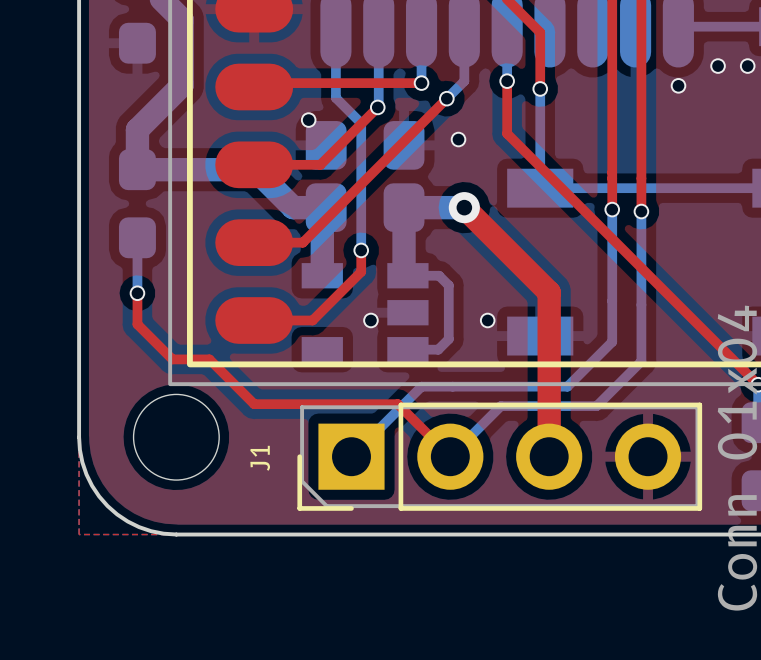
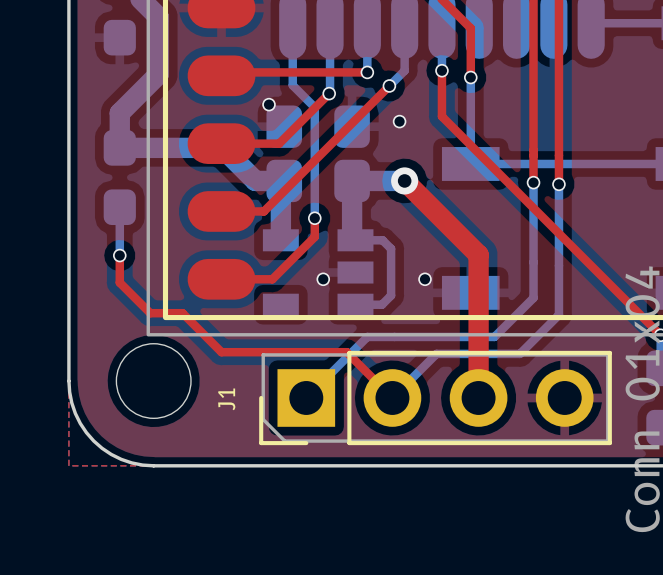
via: (718, 66) -> none
via: (747, 66) -> none
via: (678, 85) -> none

